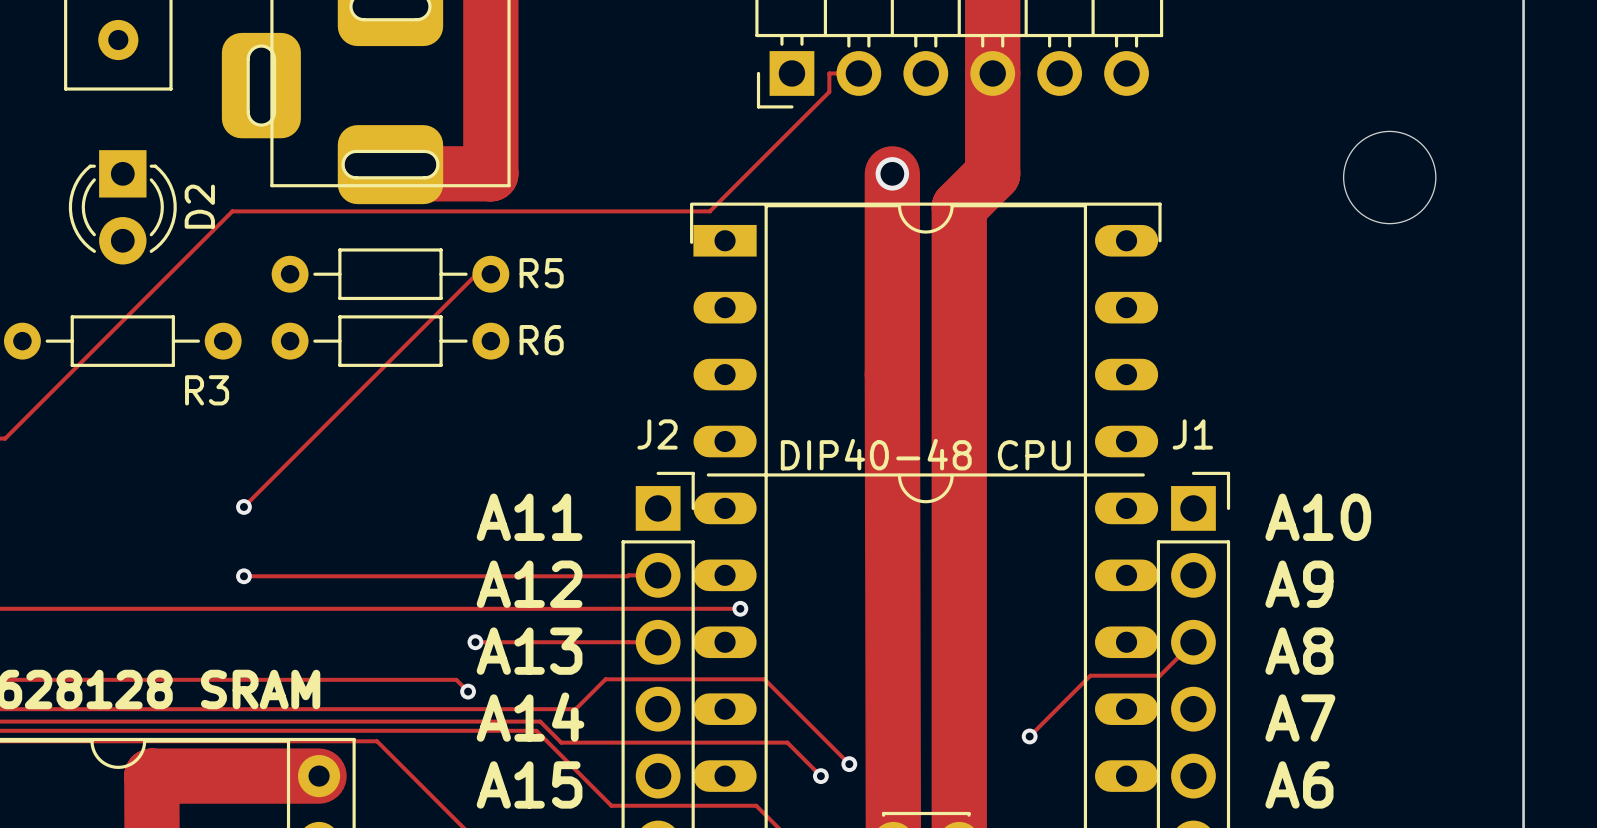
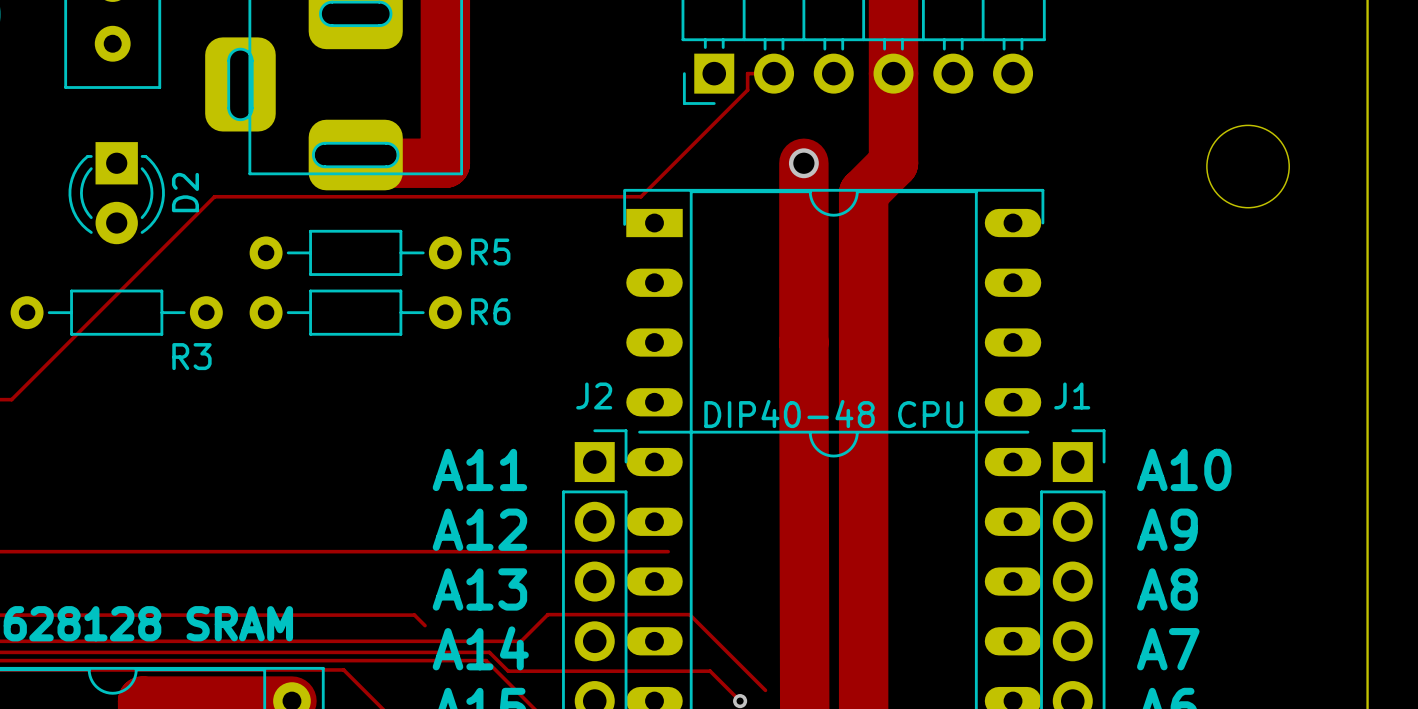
track: (490, 274) (476, 274) (243, 506) -> none
via: (243, 506) -> none
track: (658, 575) (243, 576) -> none
via: (243, 576) -> none
via: (740, 608) -> none
track: (475, 642) (658, 642) -> none
via: (475, 642) -> none
track: (1193, 642) (1160, 675) (1090, 675) (1029, 736) -> none
via: (468, 691) -> none
via: (1029, 736) -> none
via: (849, 764) -> none

